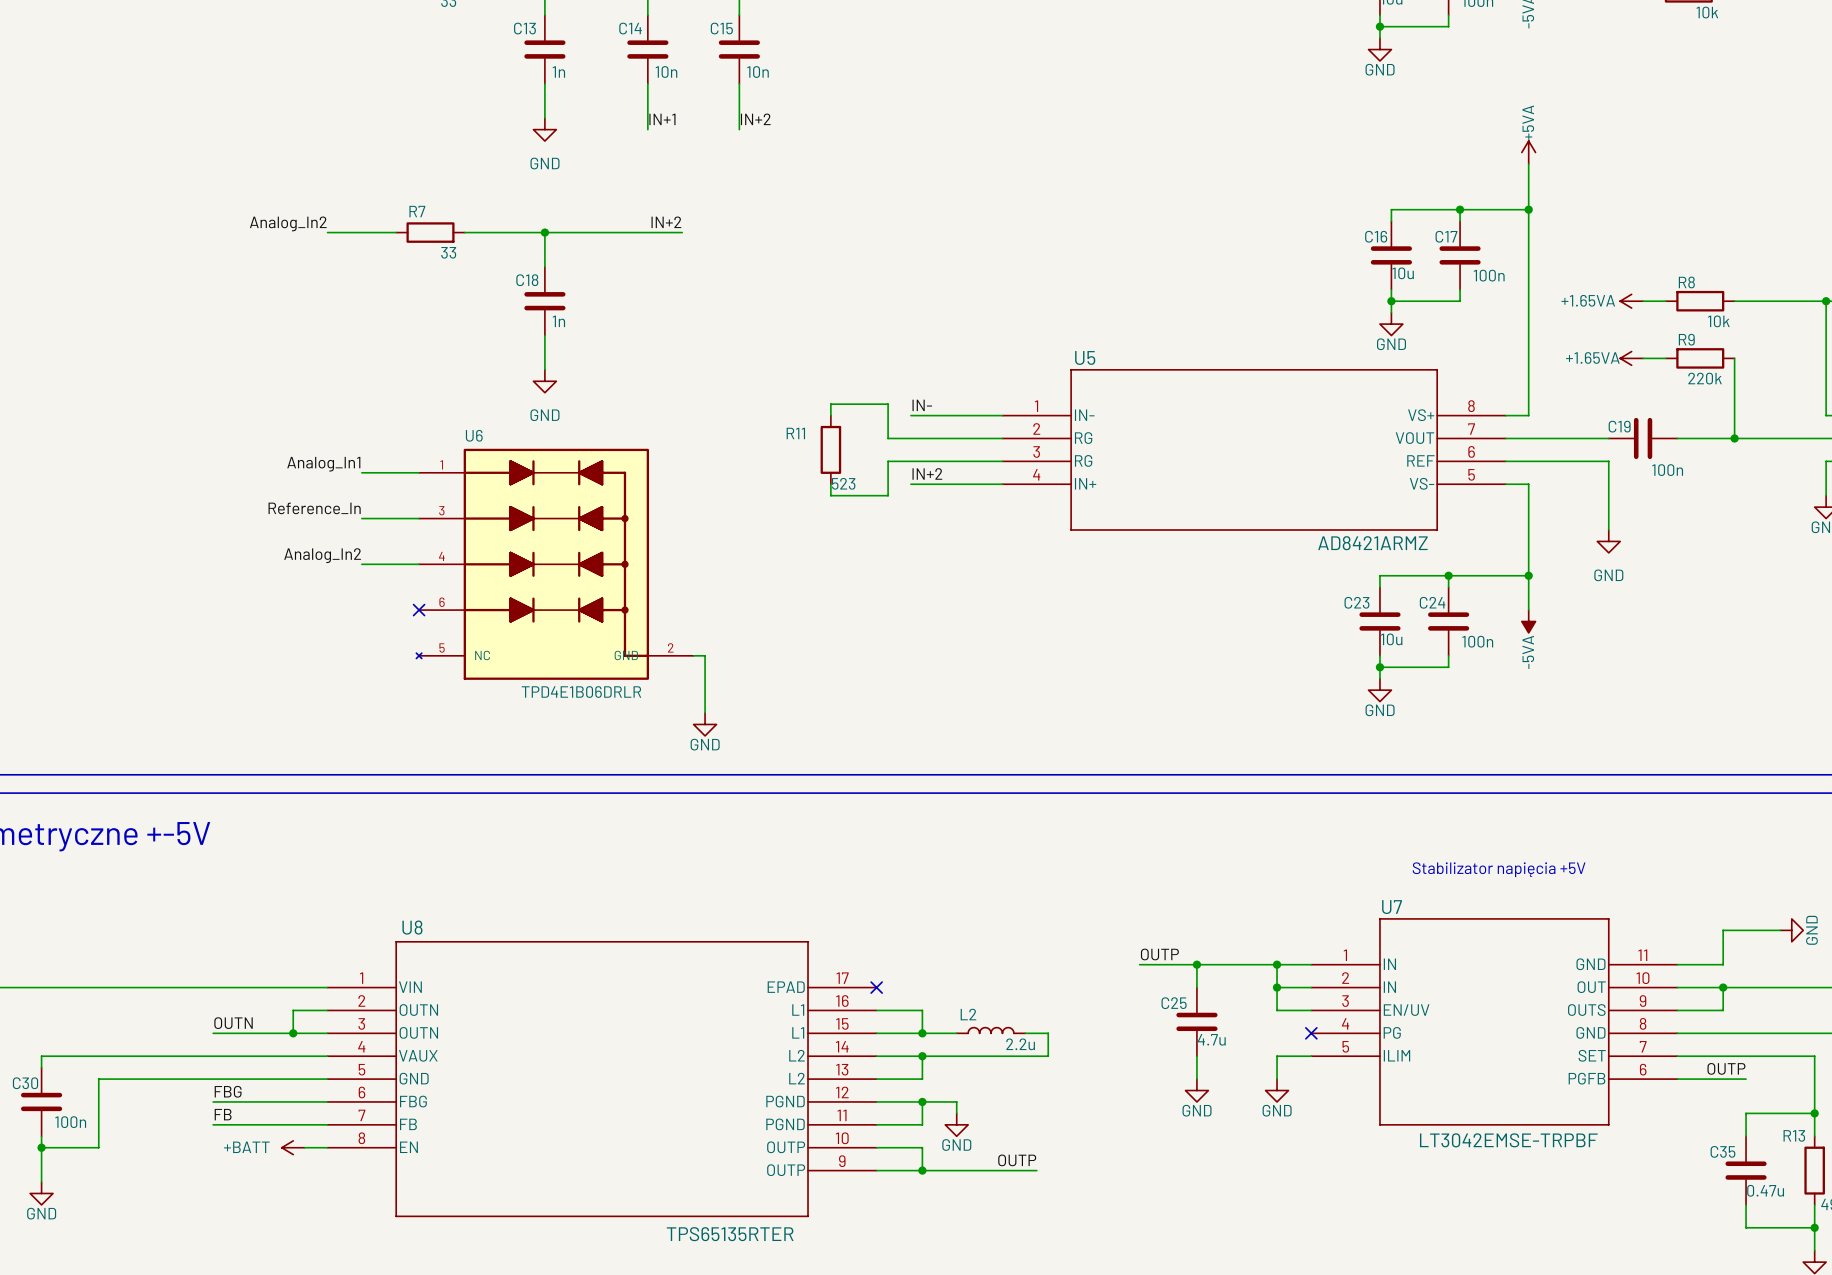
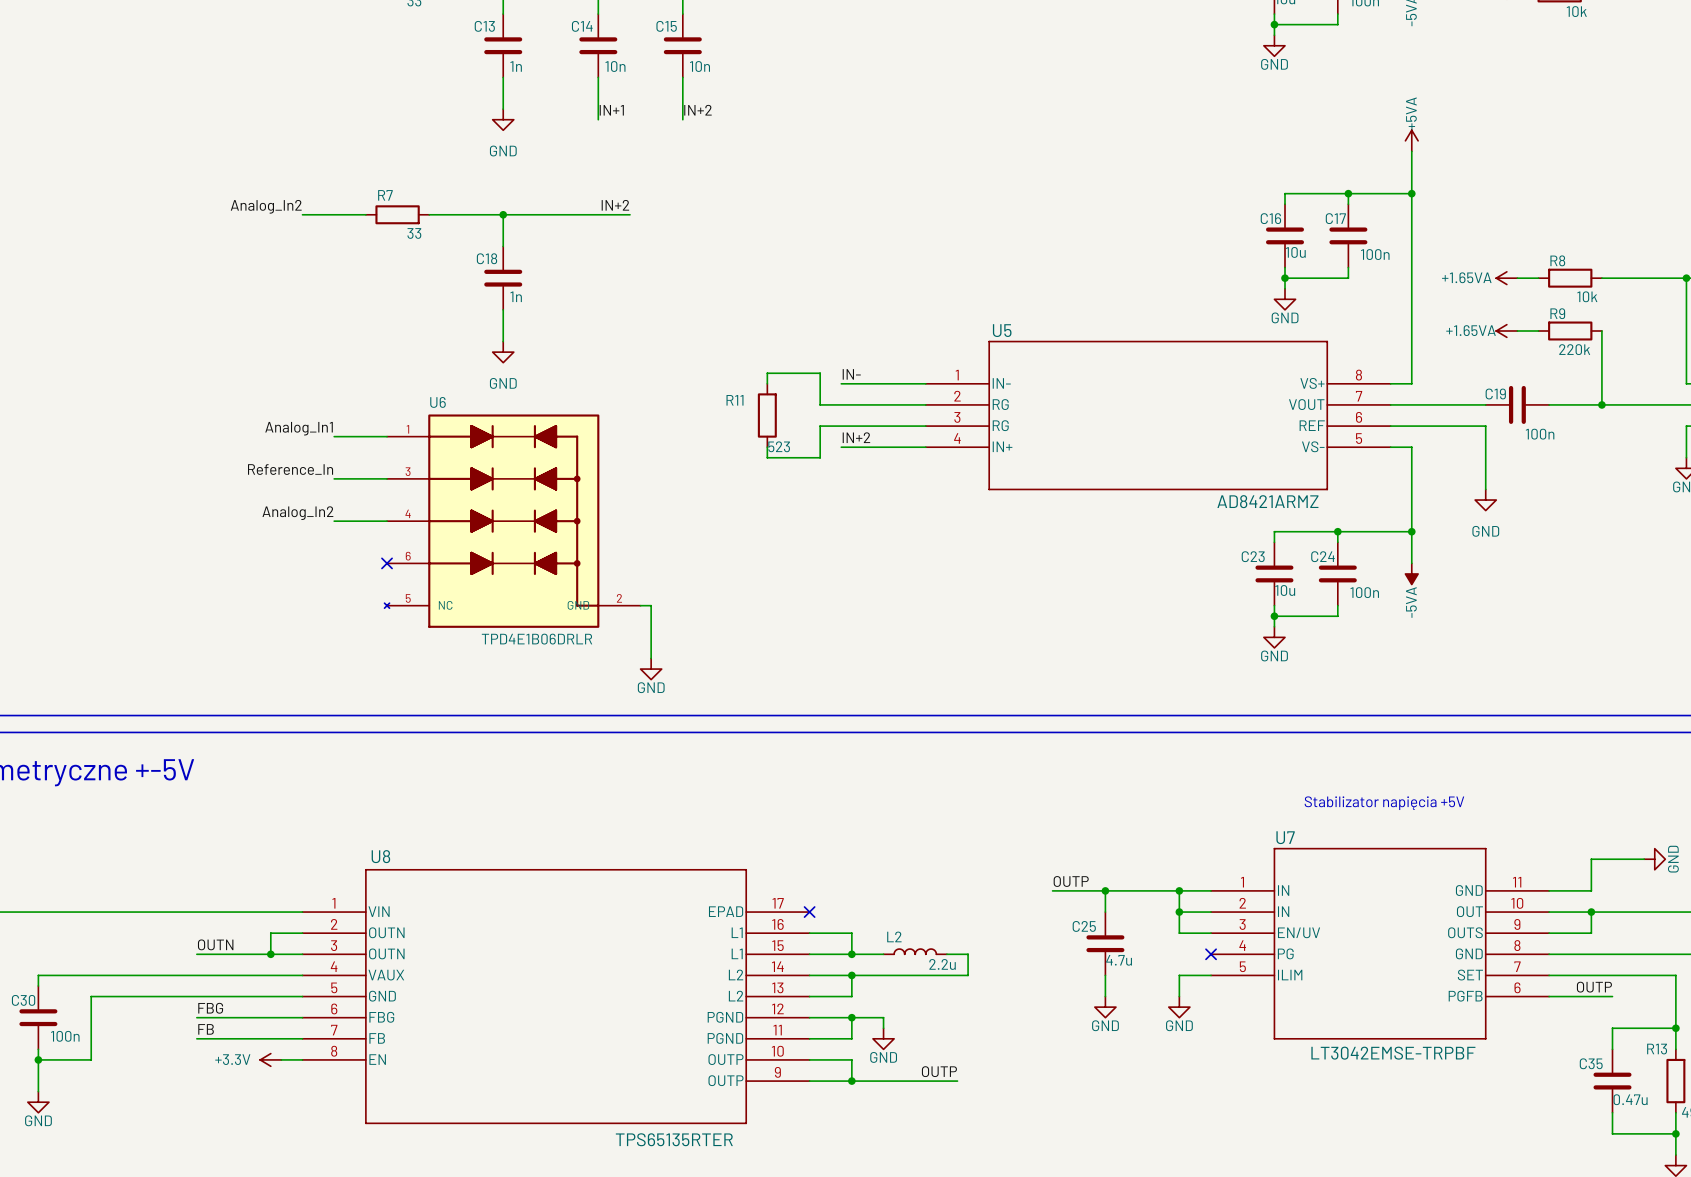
power symbol: +BATT (293, 1147) -> +3.3V (270, 1059)

